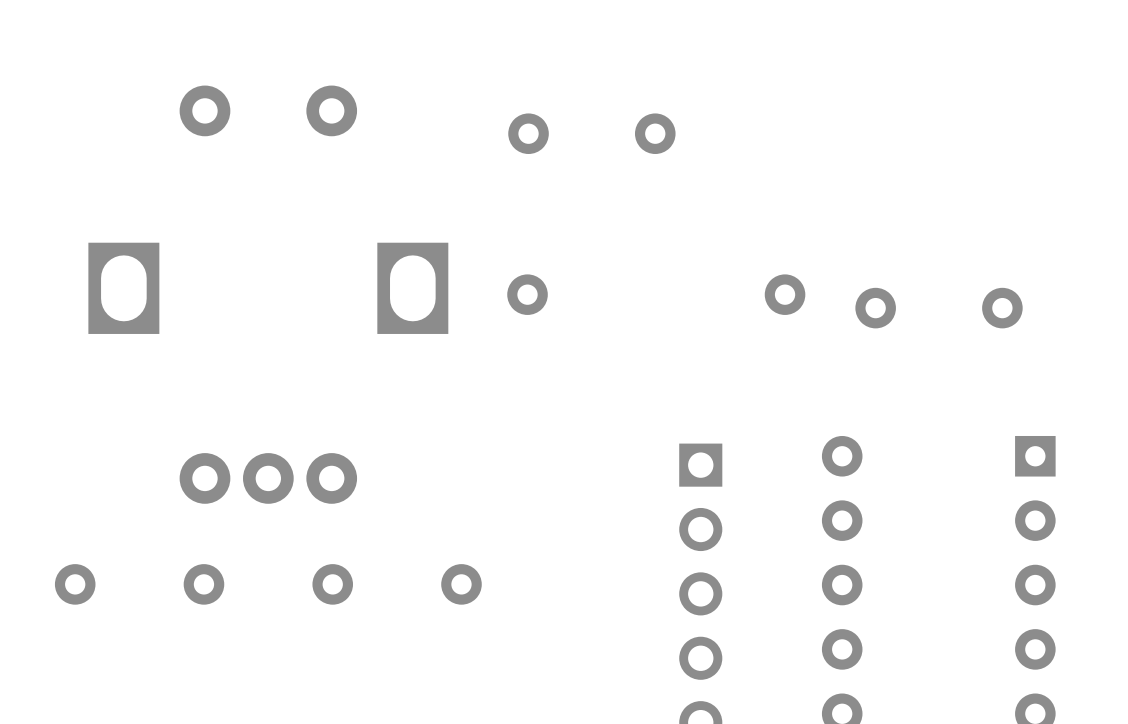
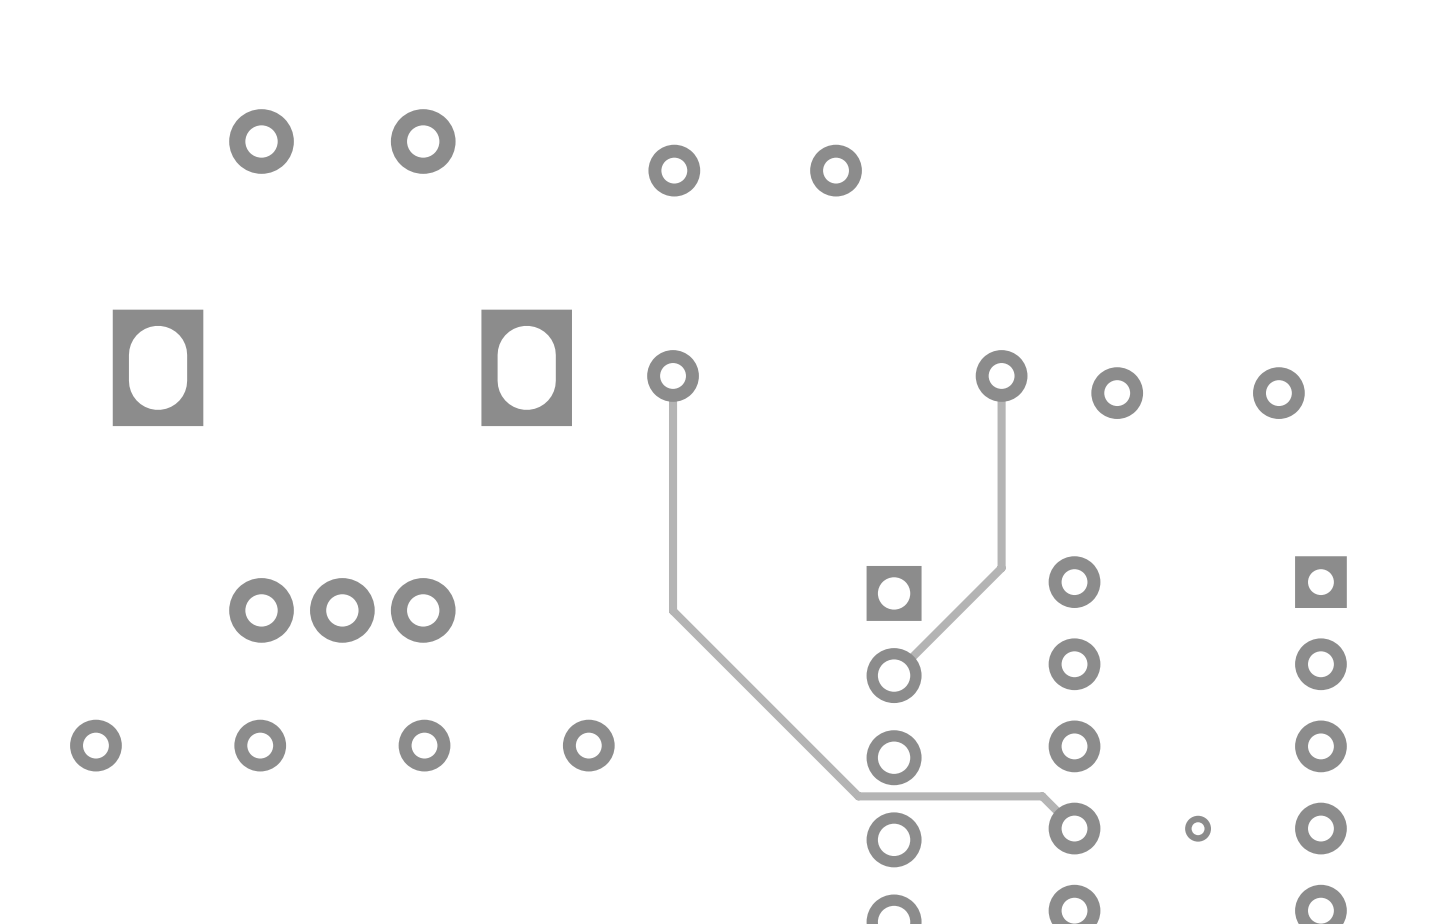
track: none -> (673, 375) (673, 610) (858, 796) (1042, 796) (1074, 828)
track: none -> (1001, 375) (1001, 568) (894, 675)
via: none -> (1198, 828)

